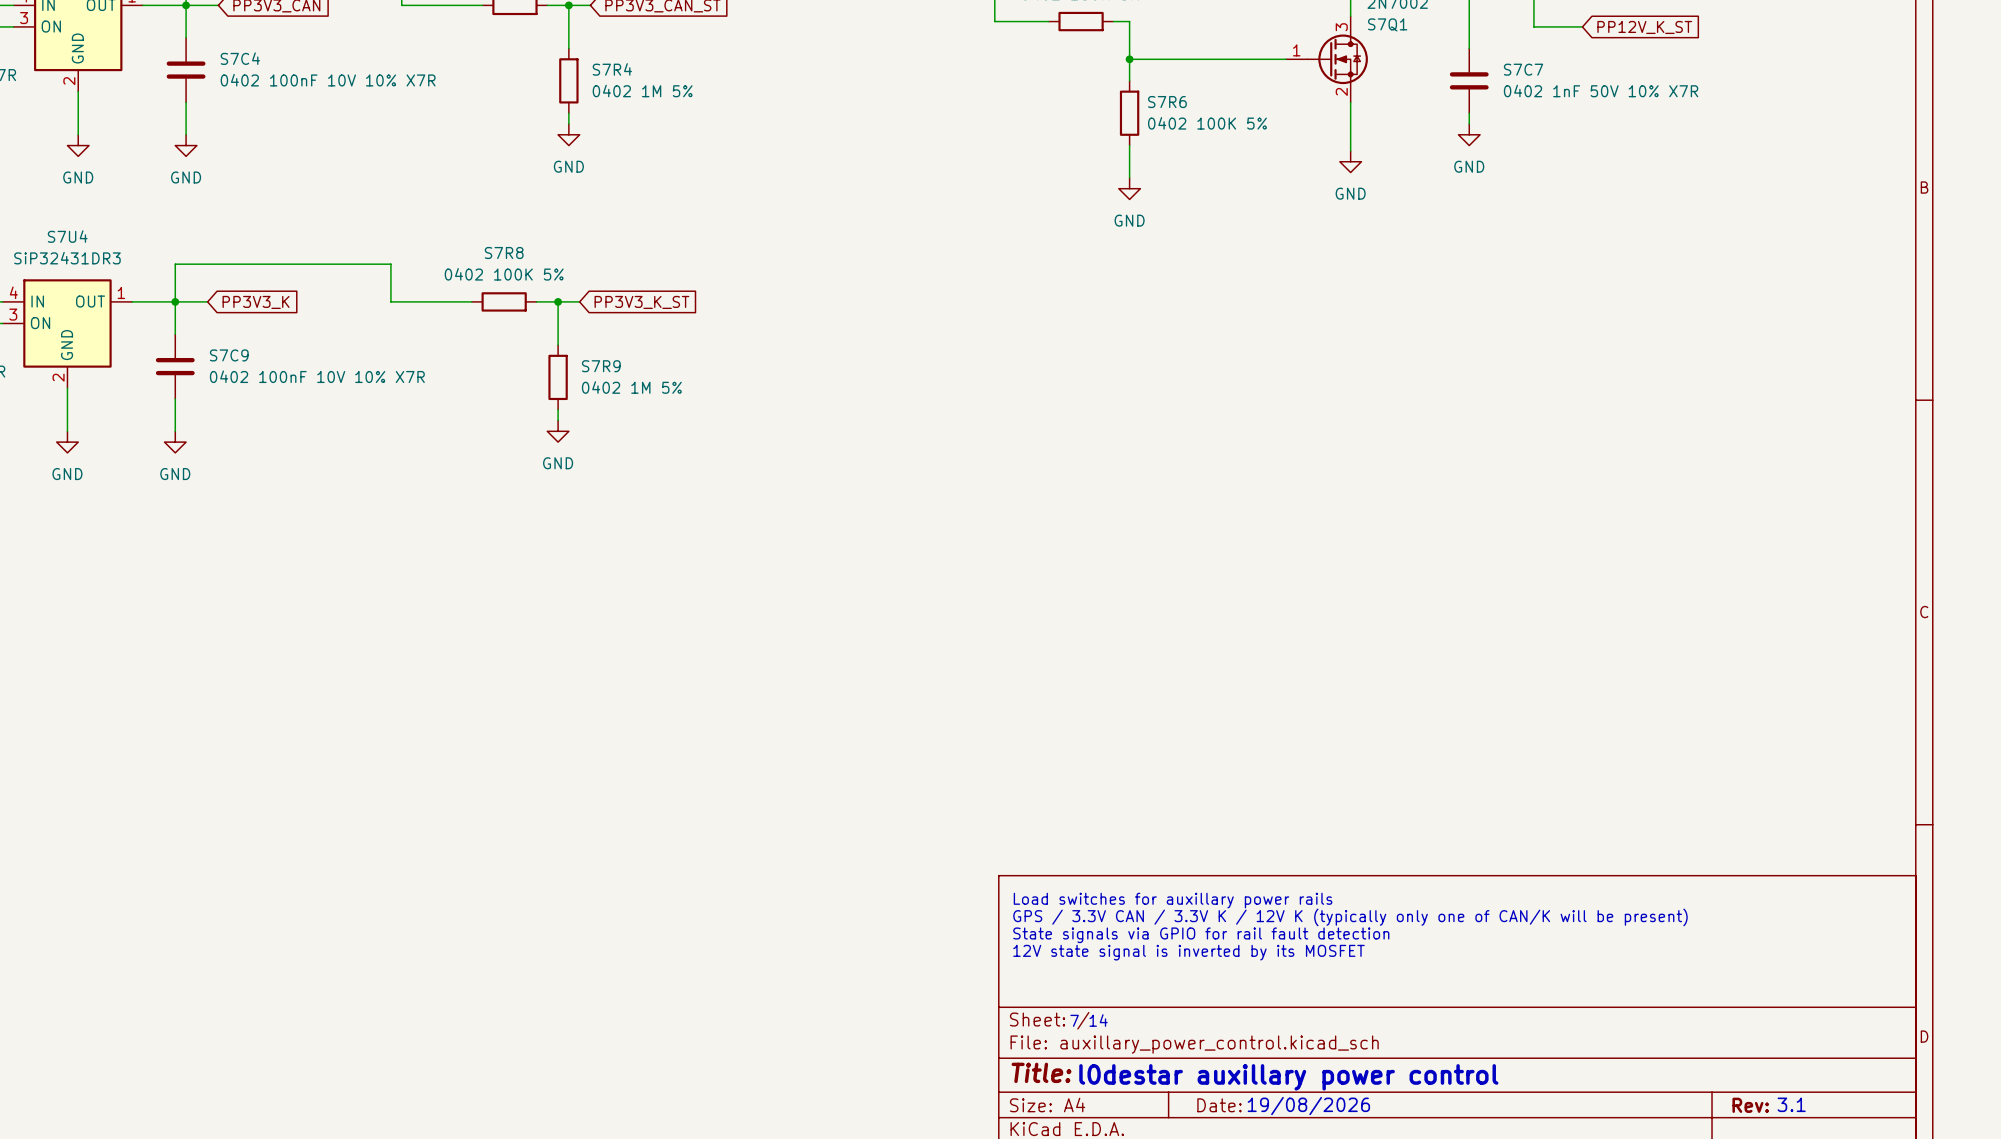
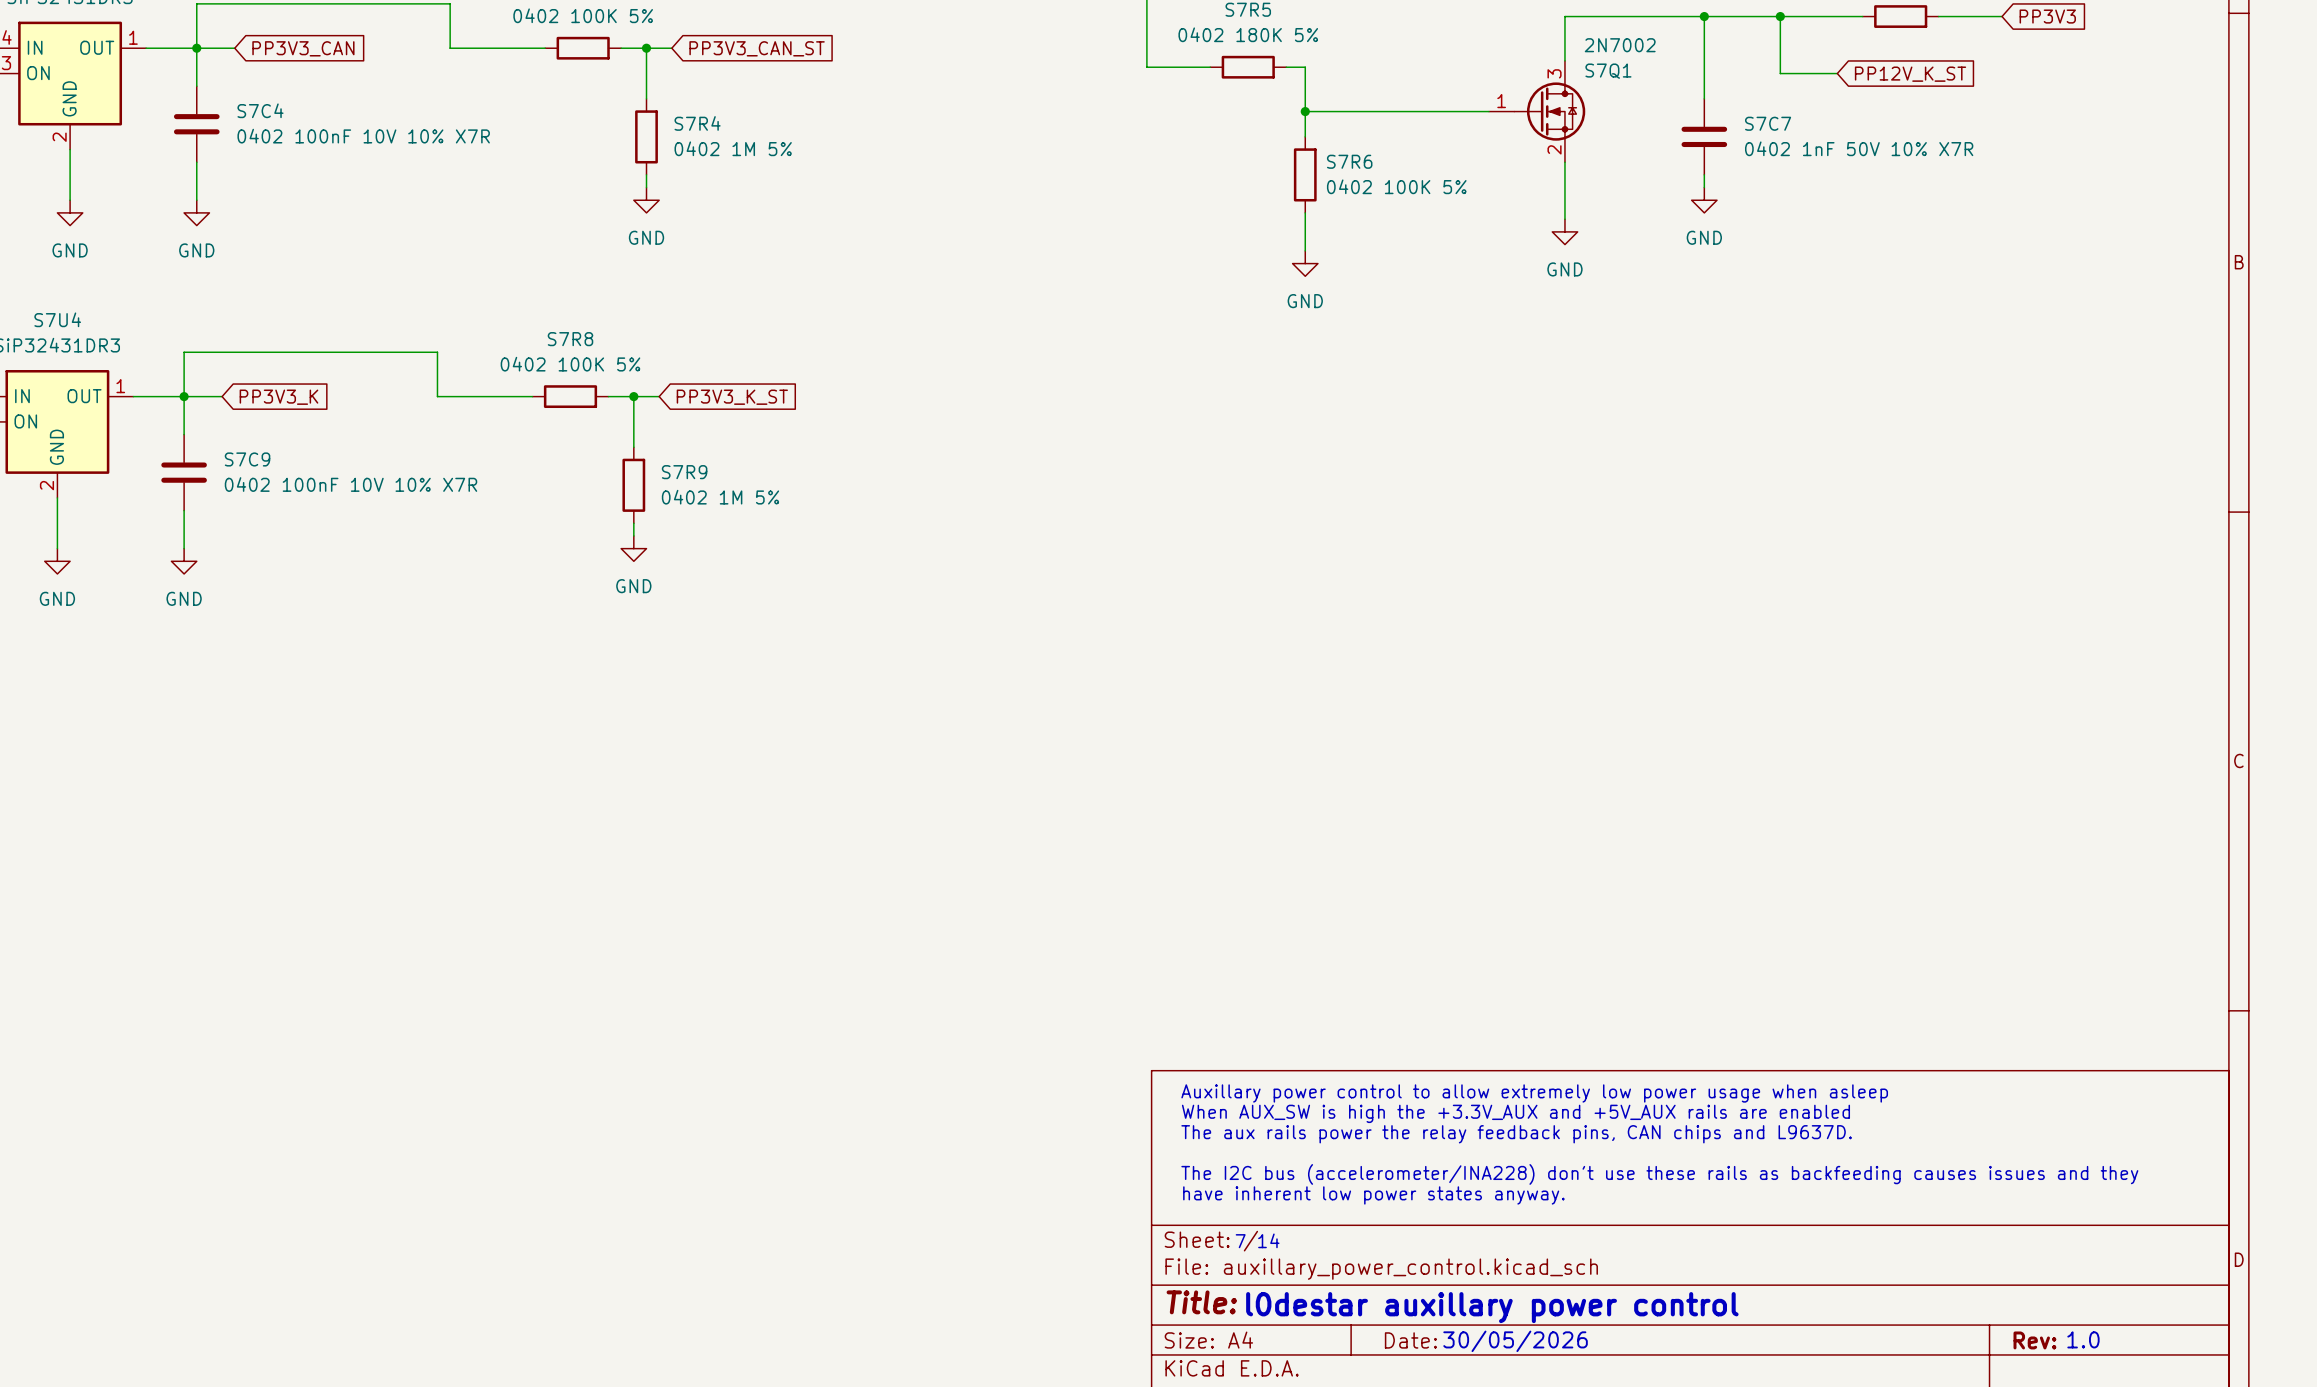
text: none -> Auxillary power control to allow extremely low power usage when asleep (1534, 1093)
text: Load switches for auxillary power rails (1173, 900) -> none
text: none -> When AUX_SW is high the +3.3V_AUX and +5V_AUX rails are enabled (1515, 1113)
text: GPS / 3.3V CAN / 3.3V K / 12V K (typically only one of CAN/K will be present) (1350, 917) -> none
text: none -> The aux rails power the relay feedback pins, CAN chips and L9637D. (1516, 1134)
text: State signals via GPIO for rail fault detection (1201, 935) -> none
text: 12V state signal is inverted by its MOSFET (1188, 952) -> none
text: none -> The I2C bus (accelerometer/INA228) don't use these rails as backfeeding causes issues and they (1659, 1174)
text: none -> have inherent low power states anyway. (1373, 1195)
text: 3.1 (1791, 1104) -> 1.0 (2083, 1339)
text: 19/08/2026 (1308, 1106) -> 30/05/2026 (1515, 1341)

